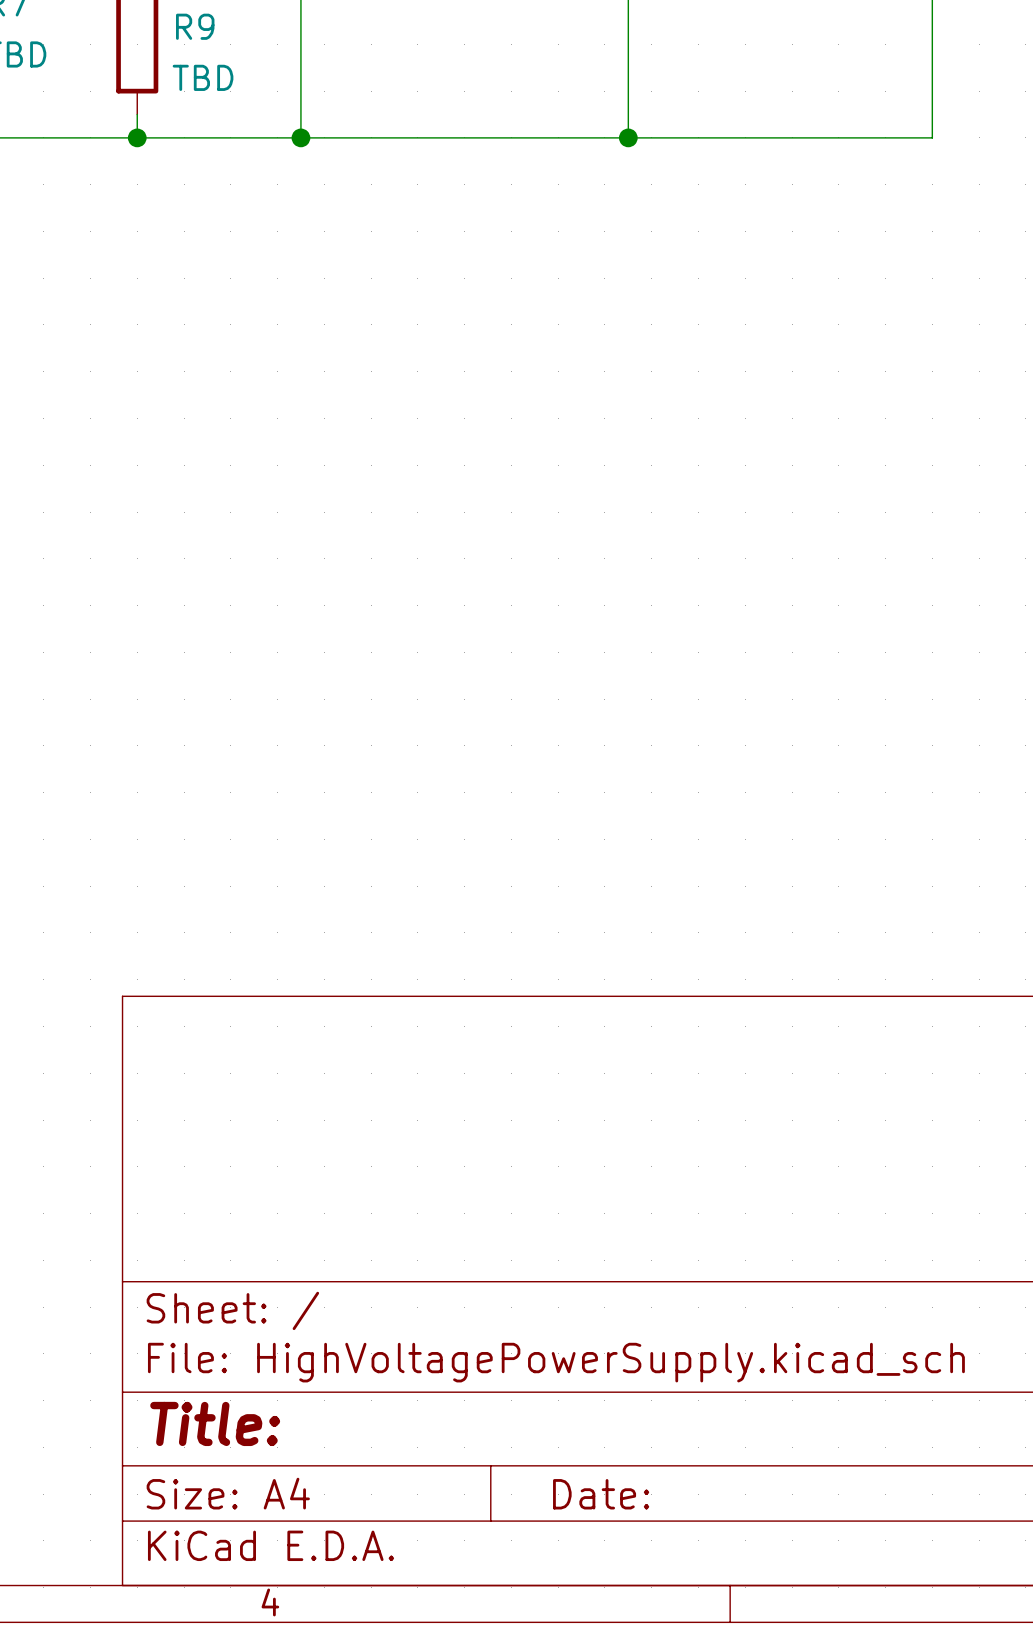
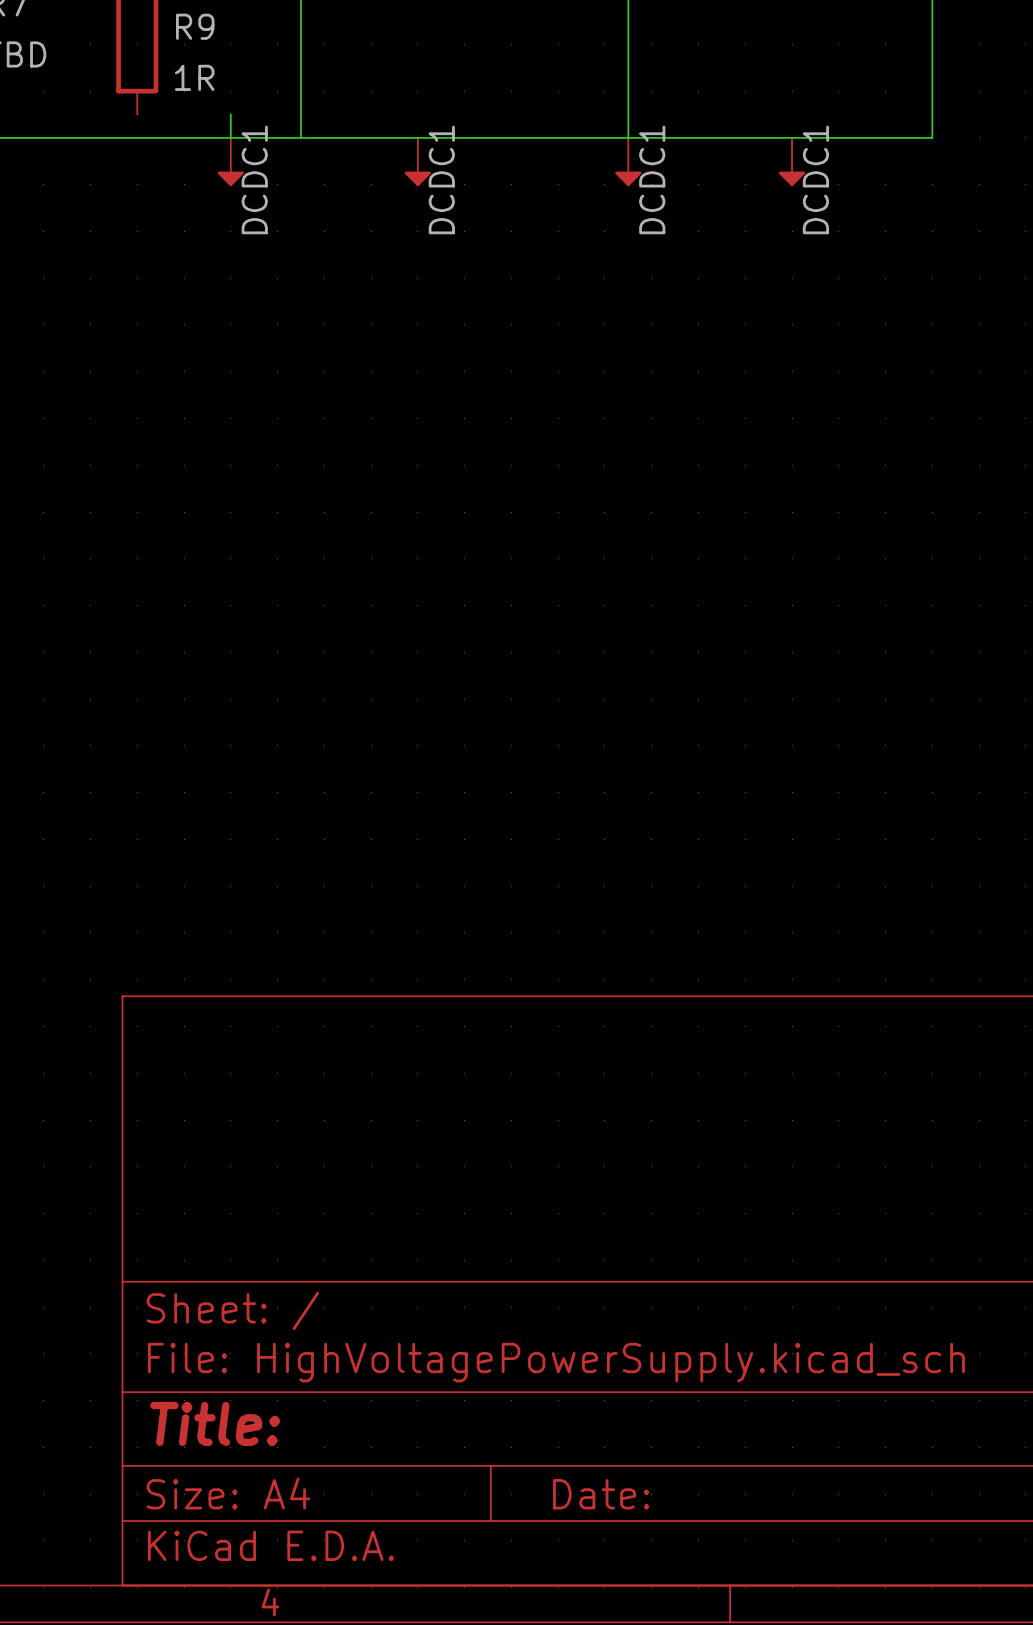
R9 value: TBD (203, 77) -> 1R (194, 77)
wire: (137, 114) (137, 137) -> (230, 114) (230, 137)
junction: (137, 137) -> none
junction: (300, 137) -> none
junction: (628, 137) -> none
power symbol: none -> DCDC1 (230, 161)
power symbol: none -> DCDC1 (417, 161)
power symbol: none -> DCDC1 (628, 161)
power symbol: none -> DCDC1 (792, 161)

